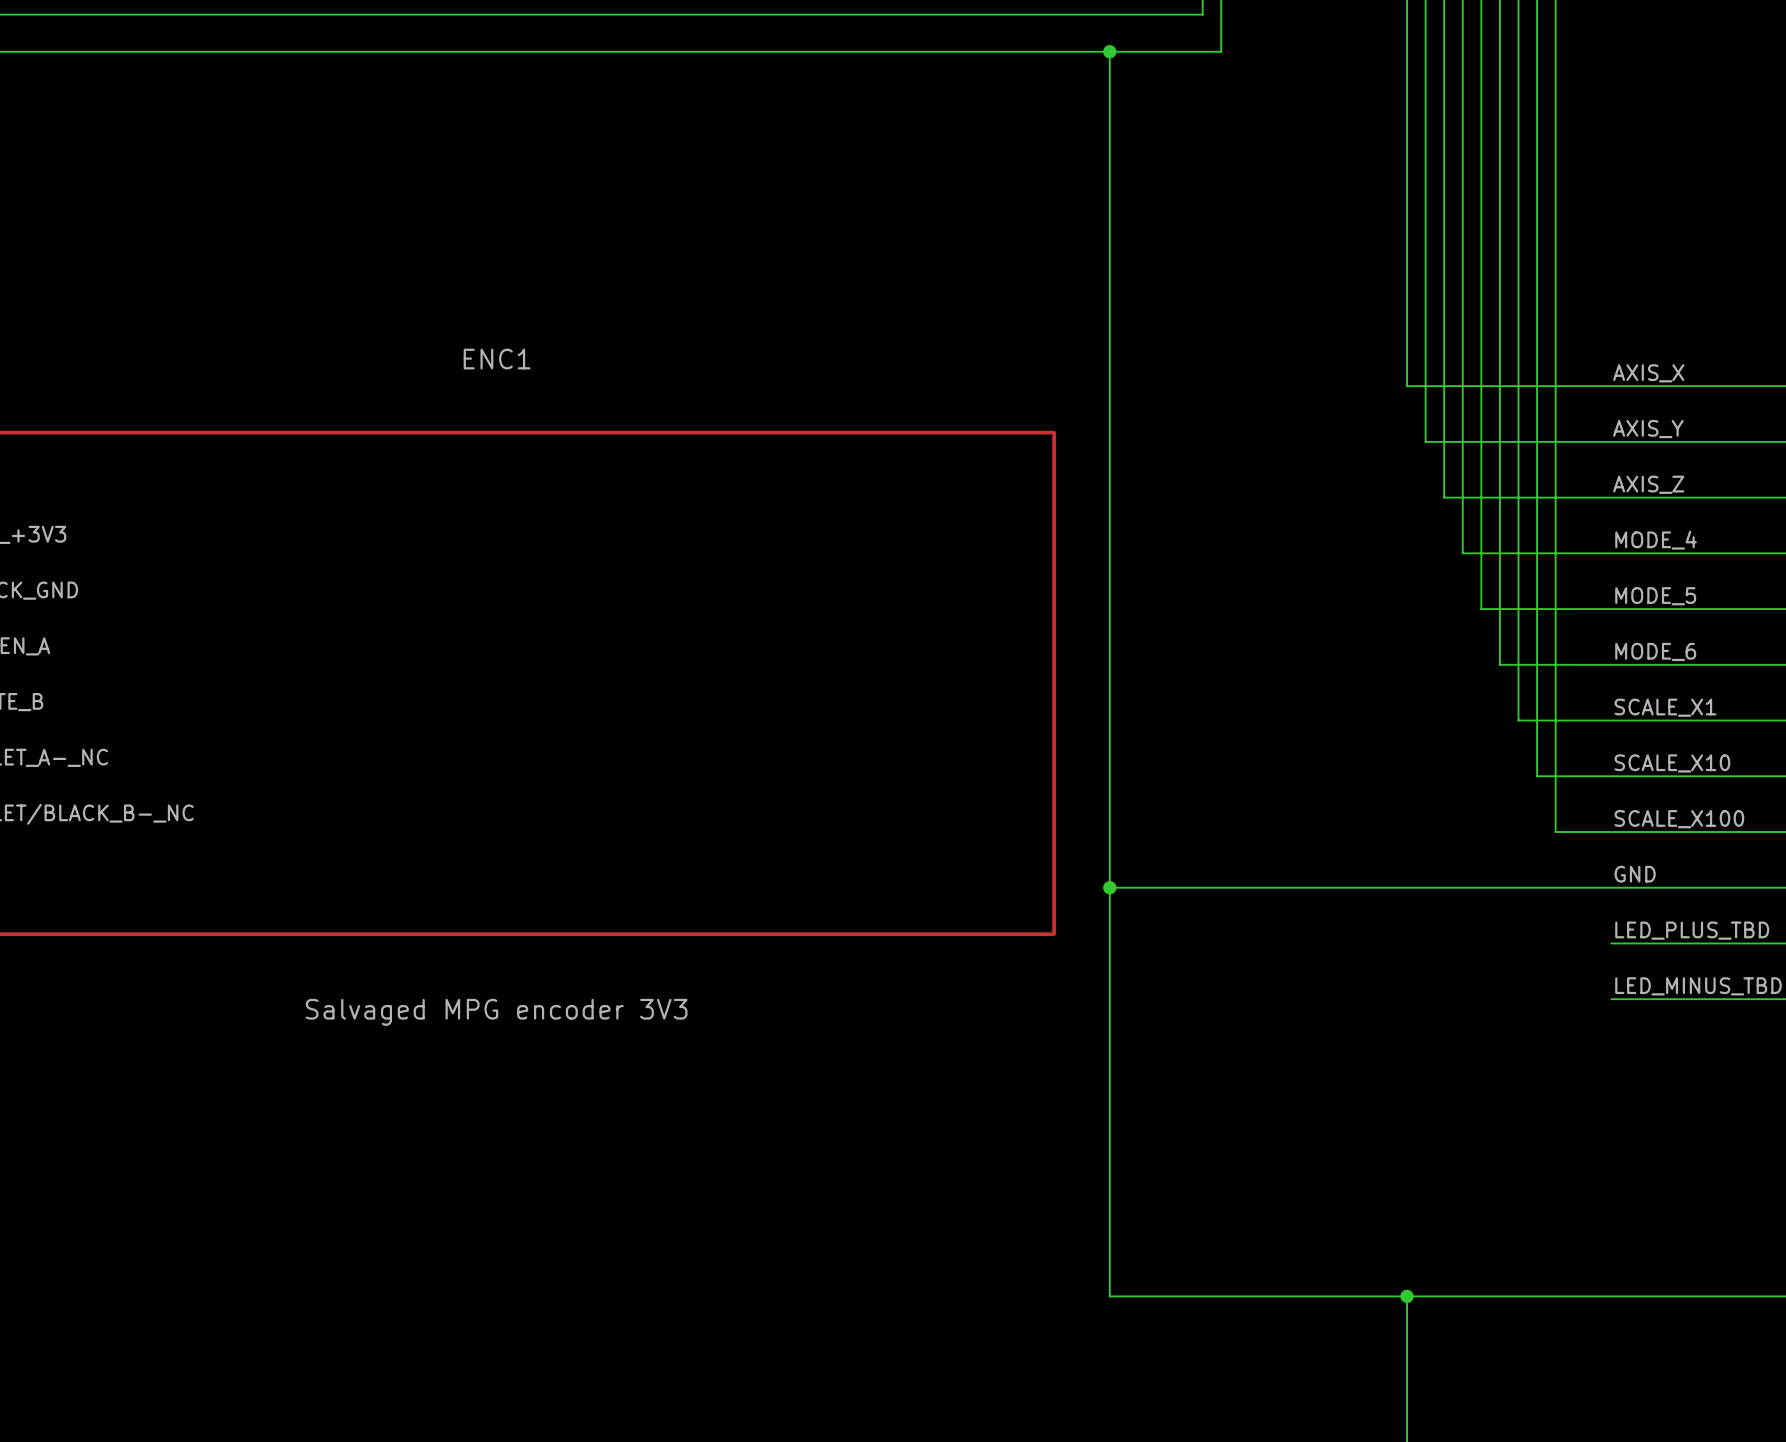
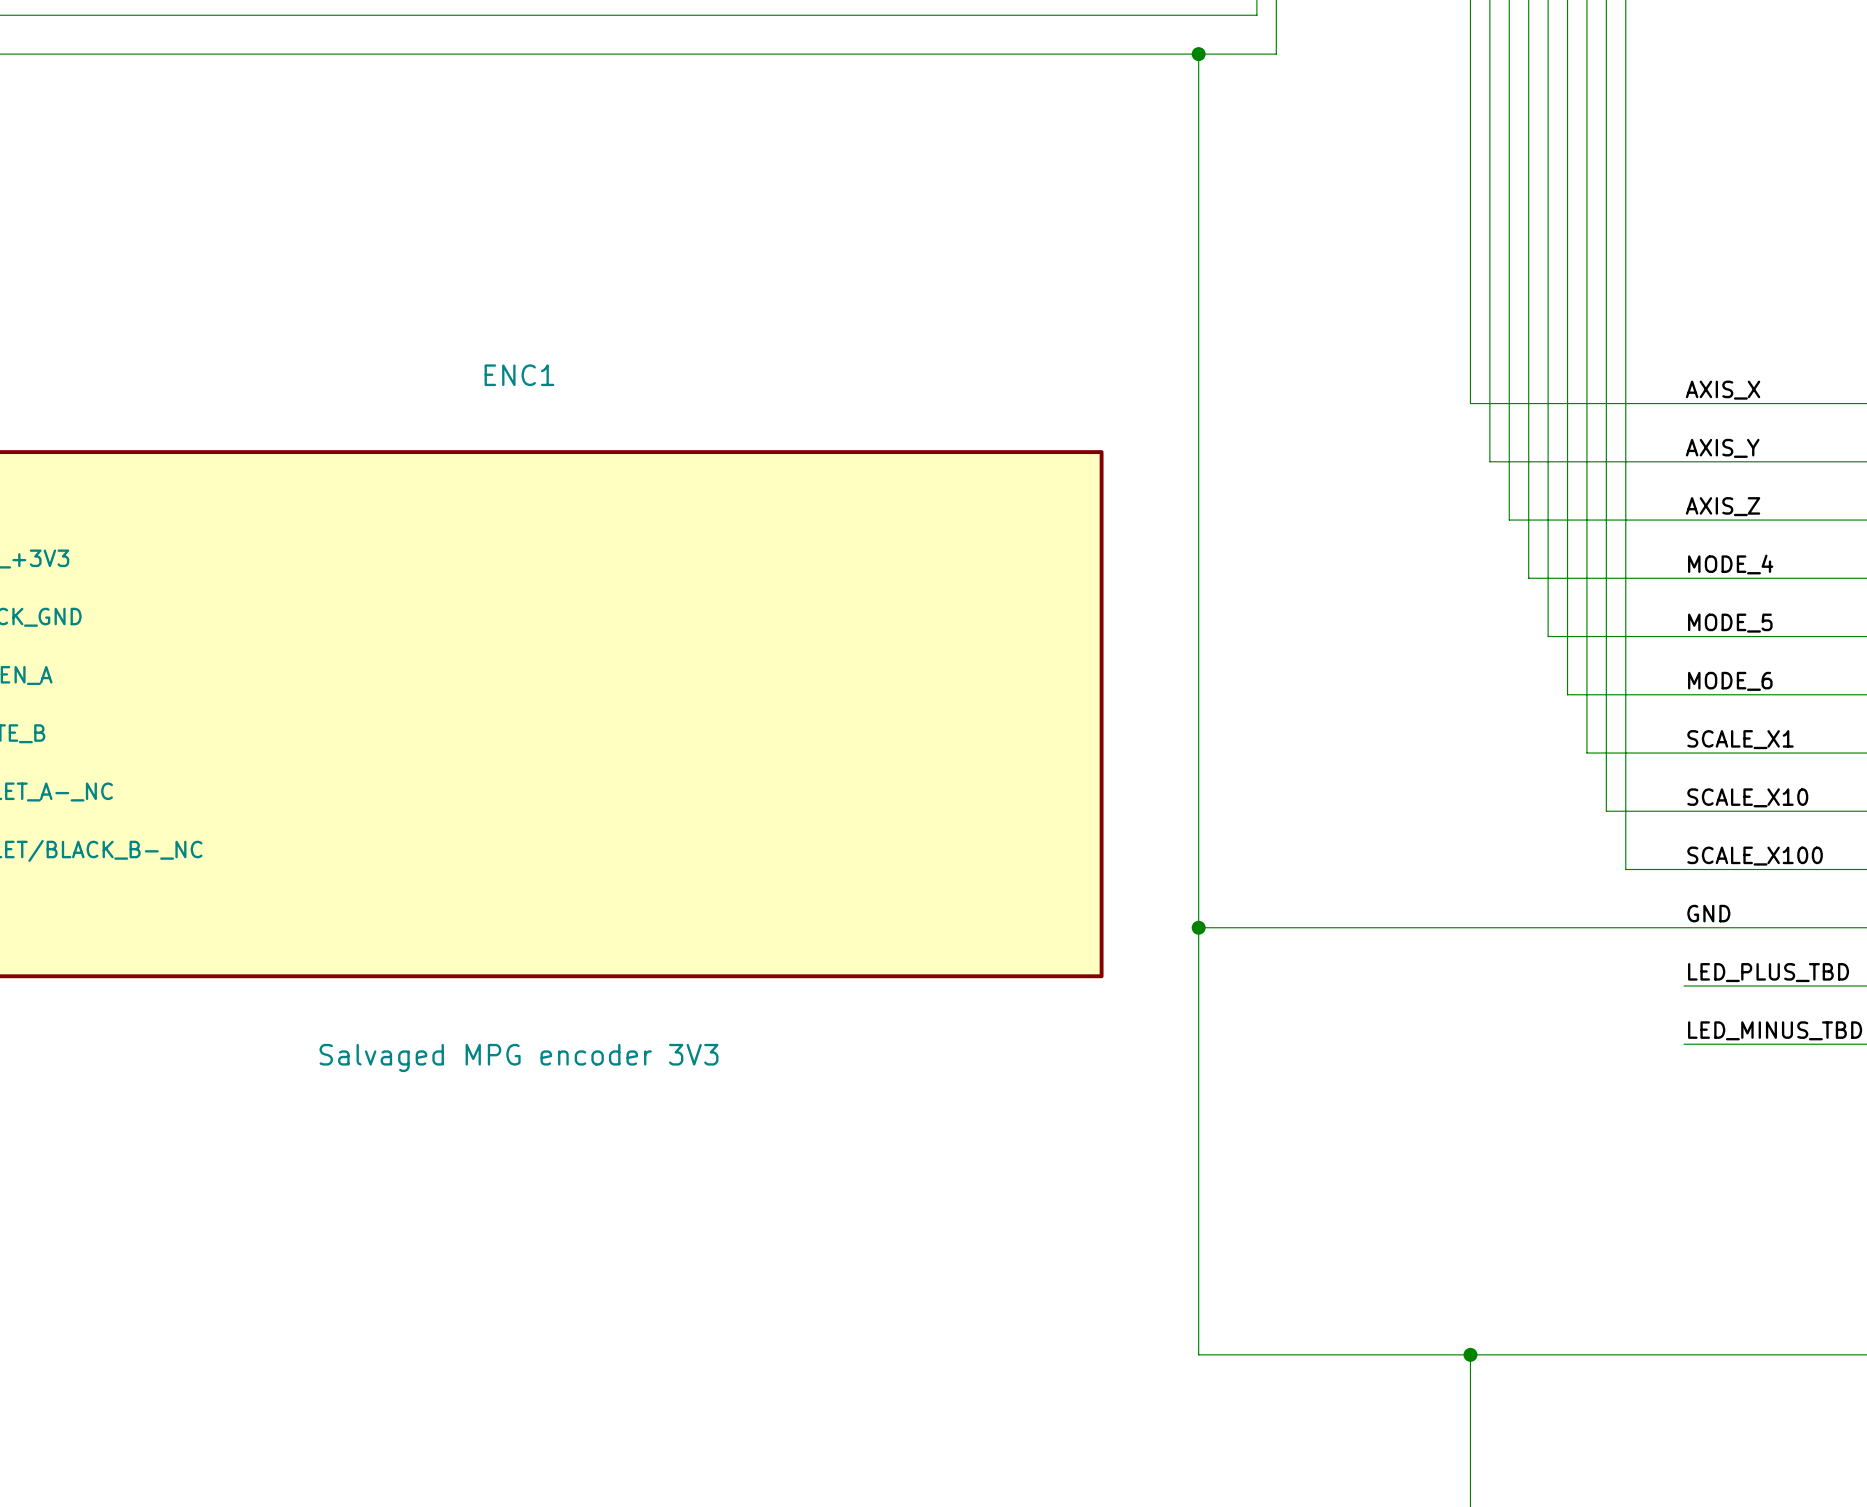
wire: (1109, 51) (1109, 1296) (1146, 1296) -> (1198, 54) (1198, 1354)
junction position: (1109, 51) -> (1198, 54)
wire: (1109, 887) (1146, 887) -> none
junction position: (1109, 887) -> (1198, 927)

